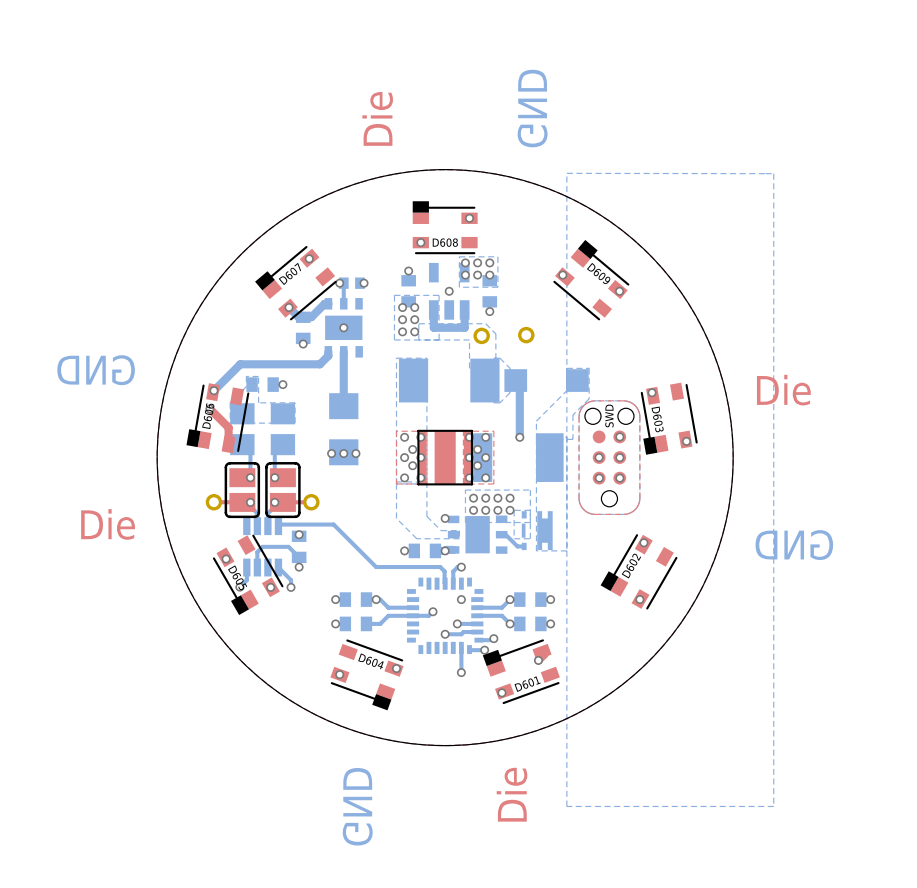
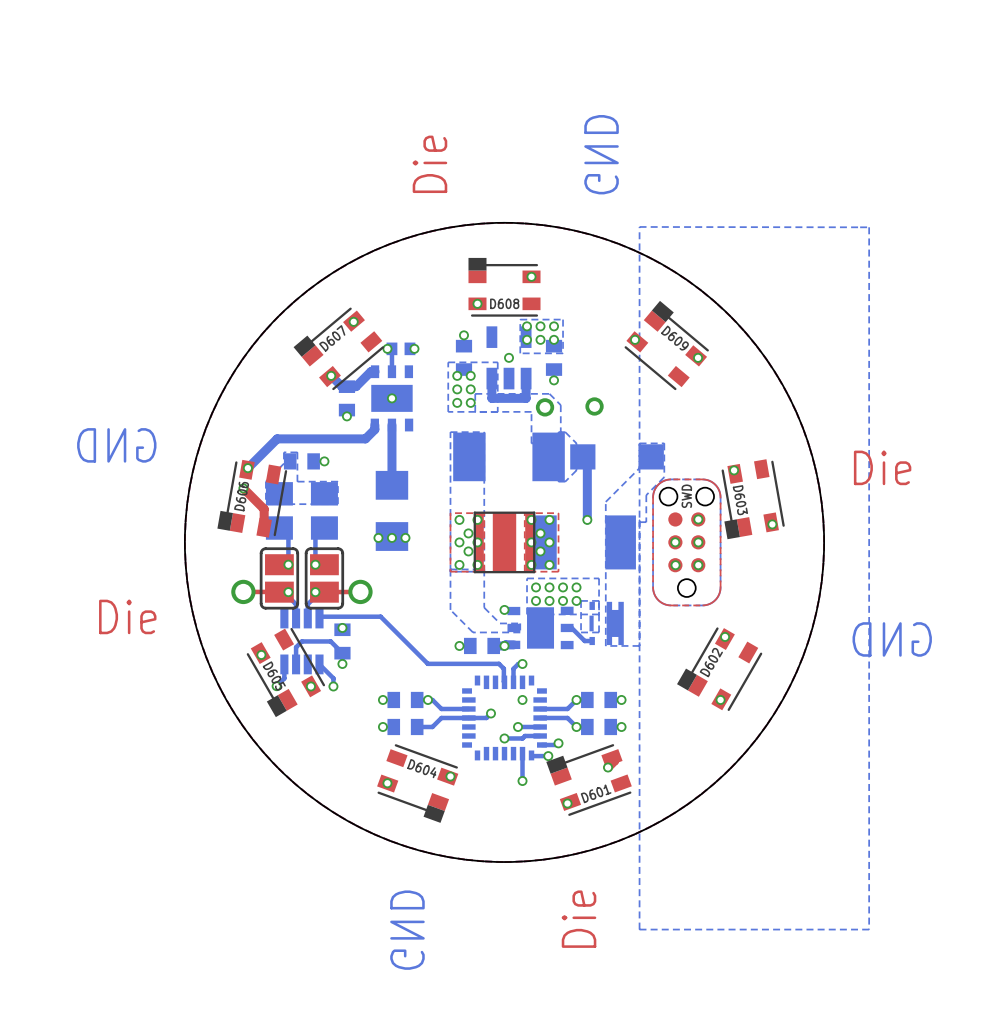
part footprint: [205, 493, 223, 511] -> [231, 579, 256, 605]
part footprint: [303, 493, 320, 511] -> [348, 579, 373, 605]

